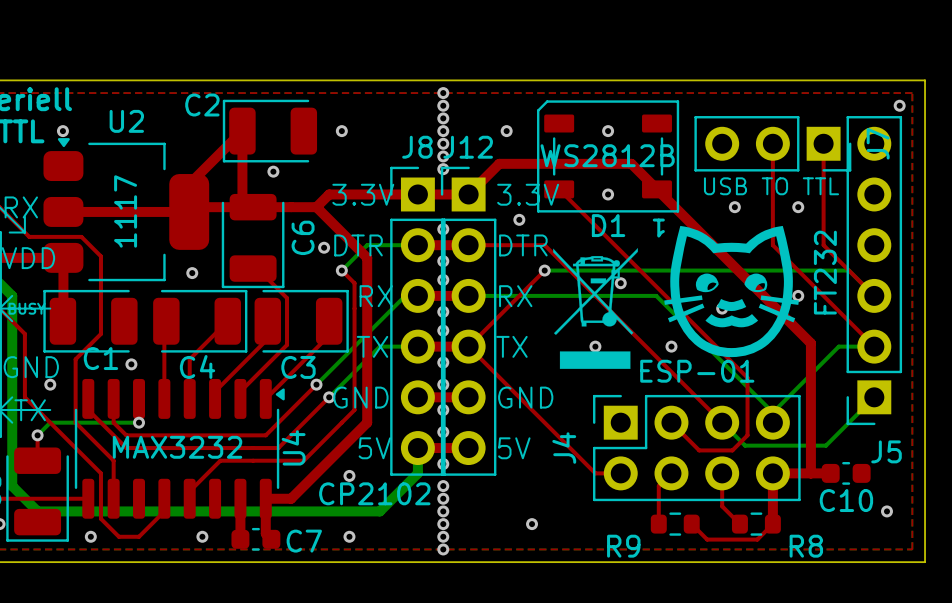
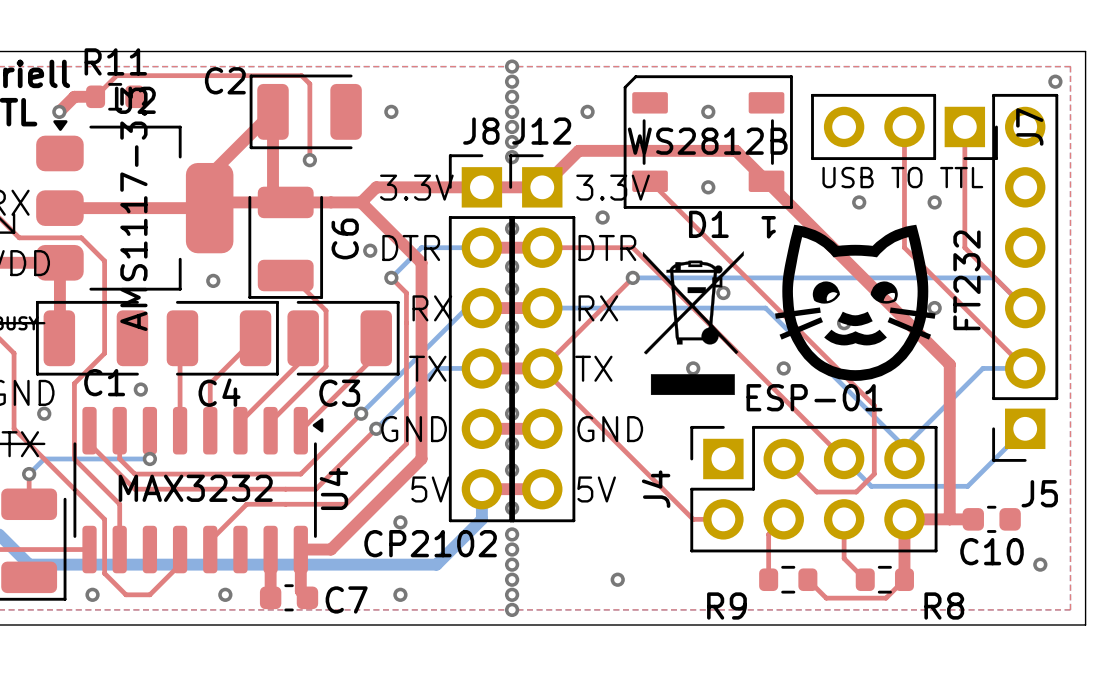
R11: none -> (115, 96)
top track: none -> (59, 111) (74, 96) (95, 96) (116, 75) (301, 75) (309, 83) (309, 160)
U2 value: 1117 (125, 211) -> AMS1117-3.3 (133, 209)

